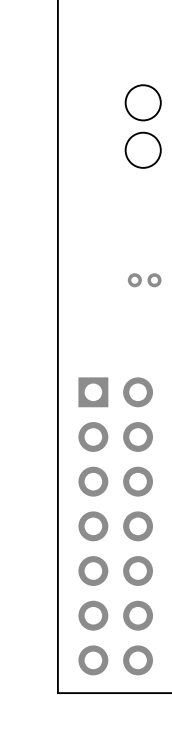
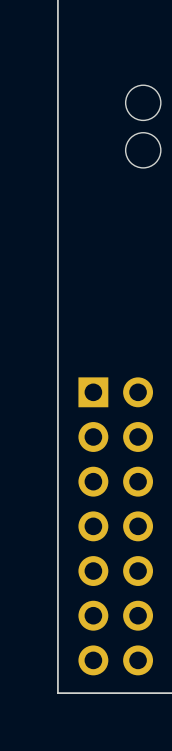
via: (134, 280) -> none
via: (154, 280) -> none

